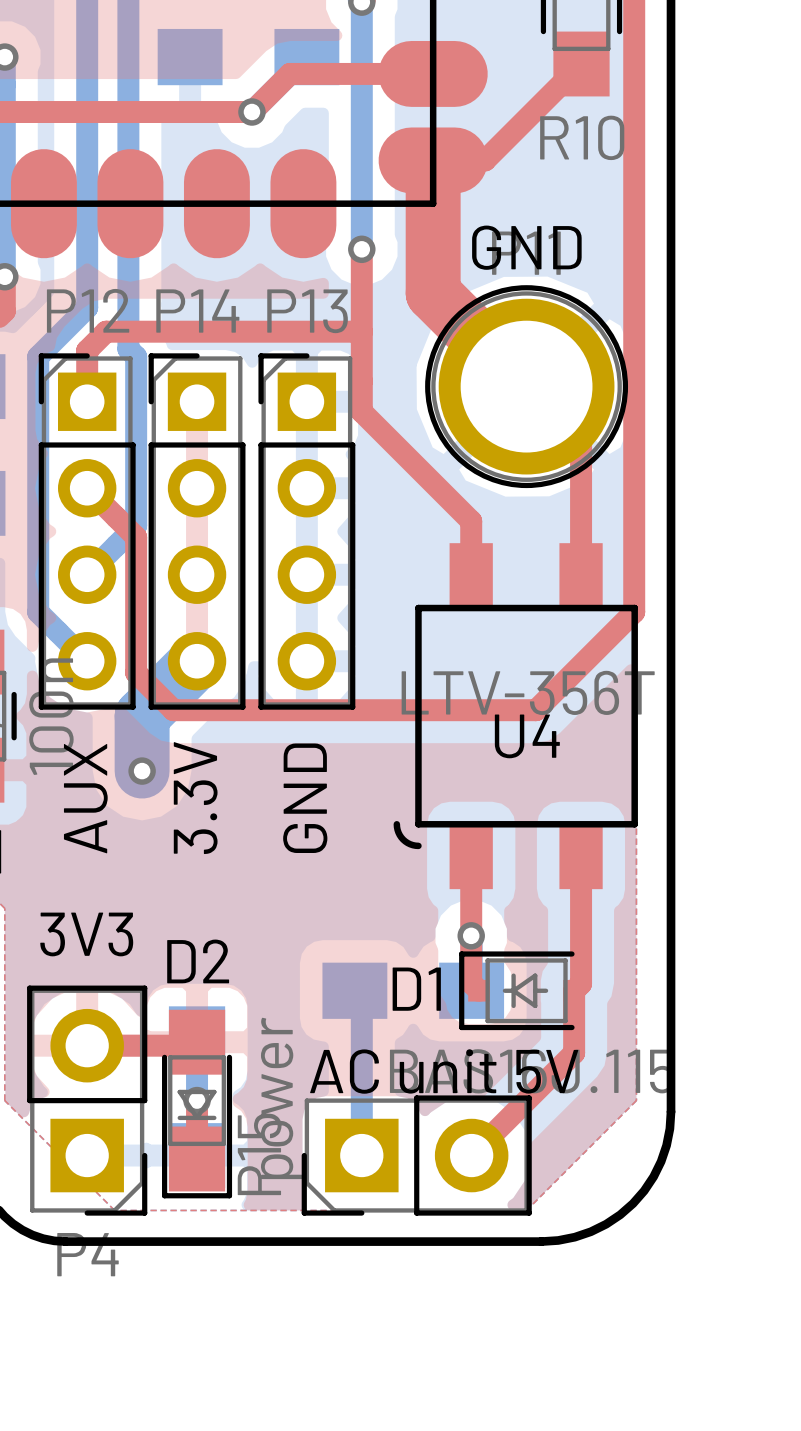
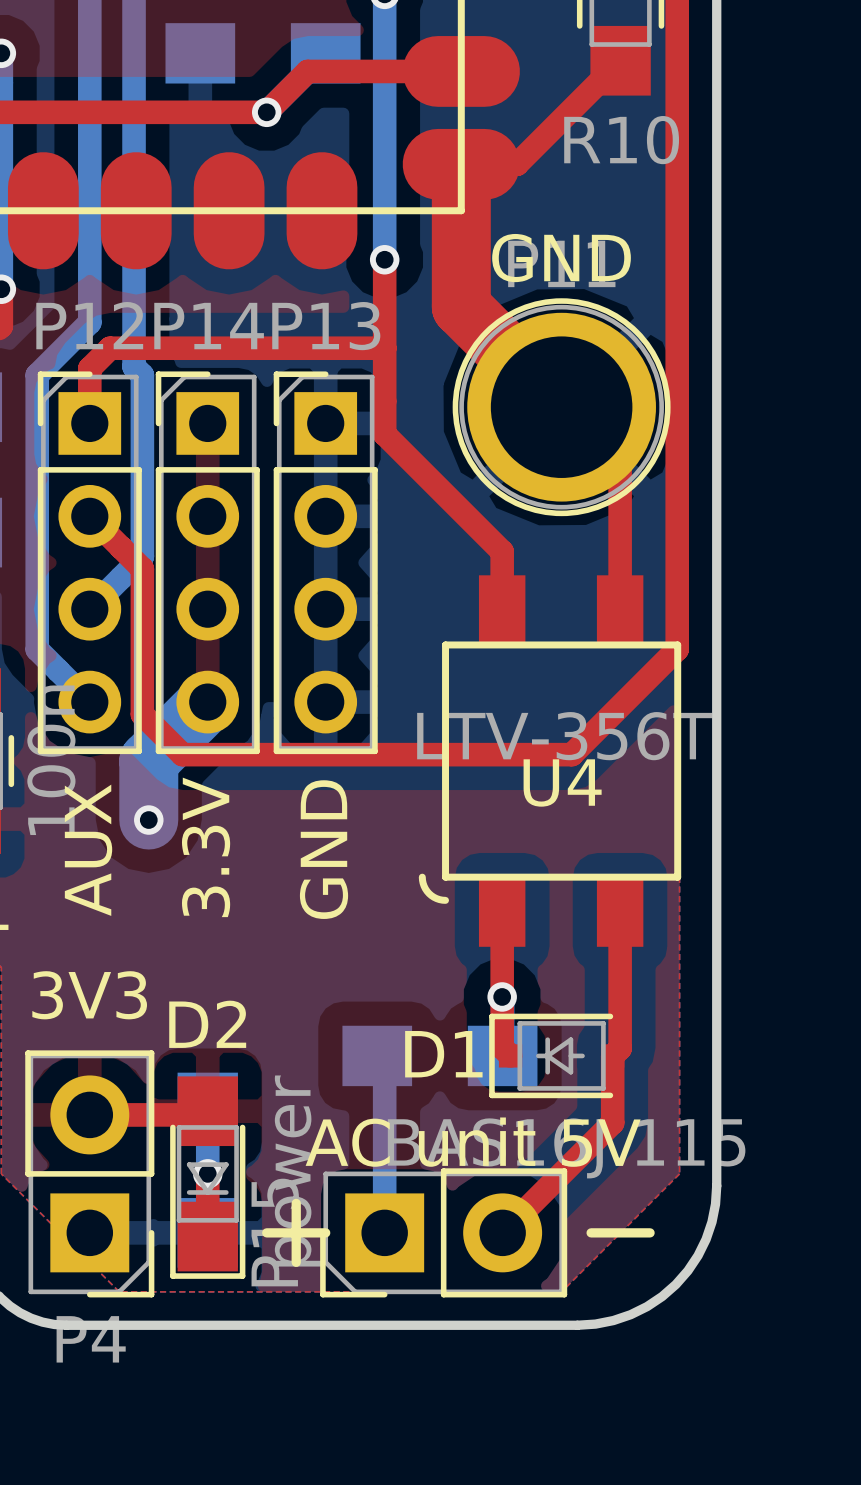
line: none -> (296, 1203) (296, 1262)
line: none -> (266, 1232) (325, 1232)
line: none -> (591, 1232) (650, 1232)

